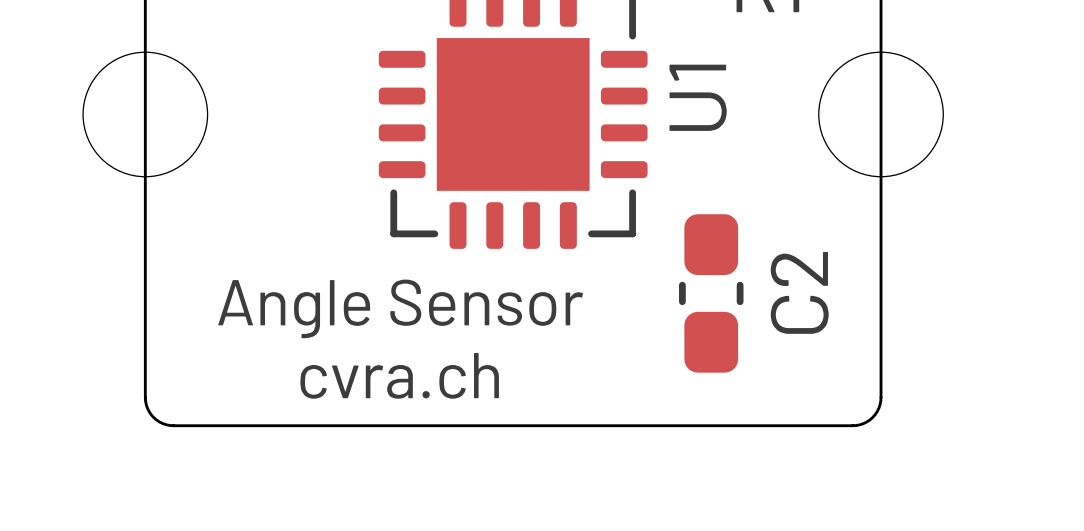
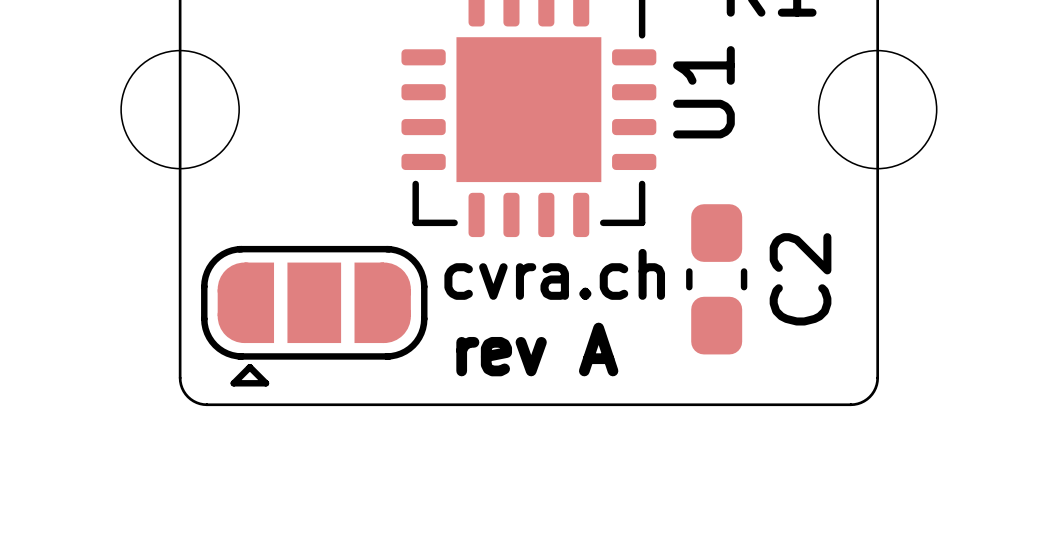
text: Angle Sensor (400, 308) -> none
part: none -> (314, 316)
text: none -> rev A (537, 349)
text position: cvra.ch (399, 375) -> cvra.ch (554, 274)

